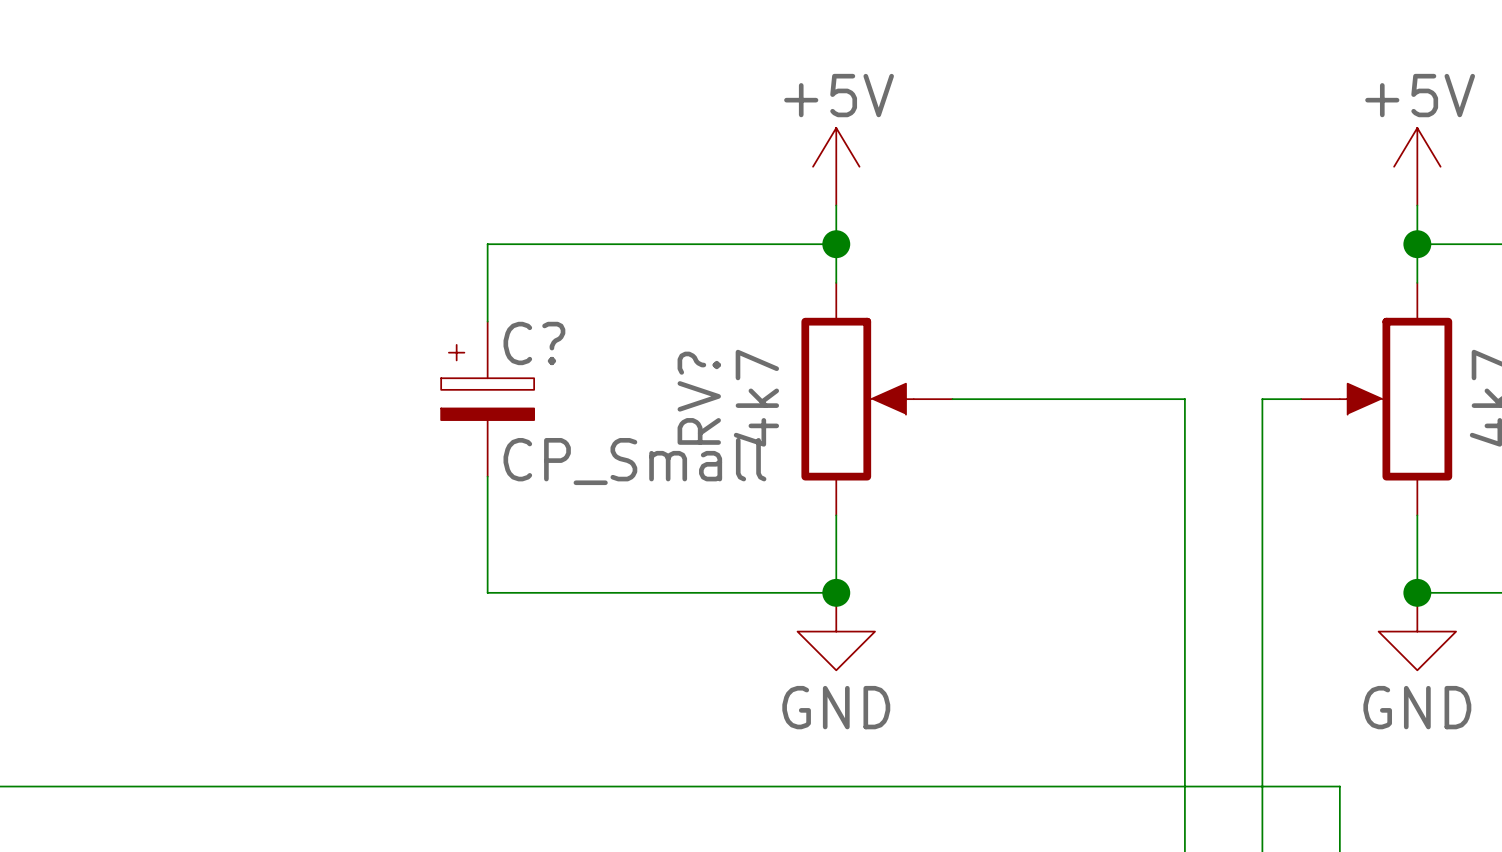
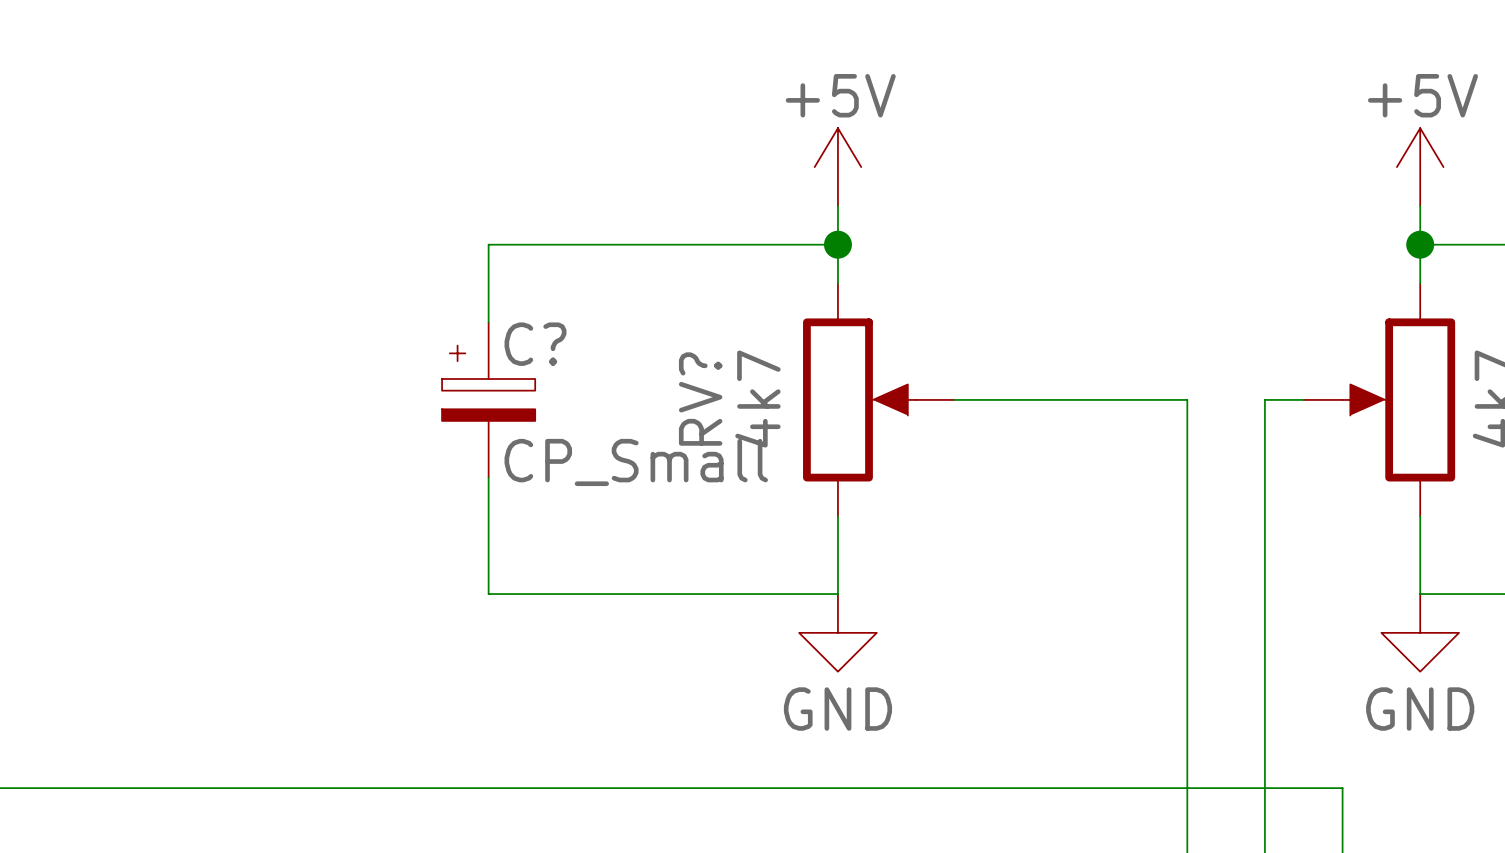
junction: (836, 592) -> none
junction: (1417, 592) -> none

